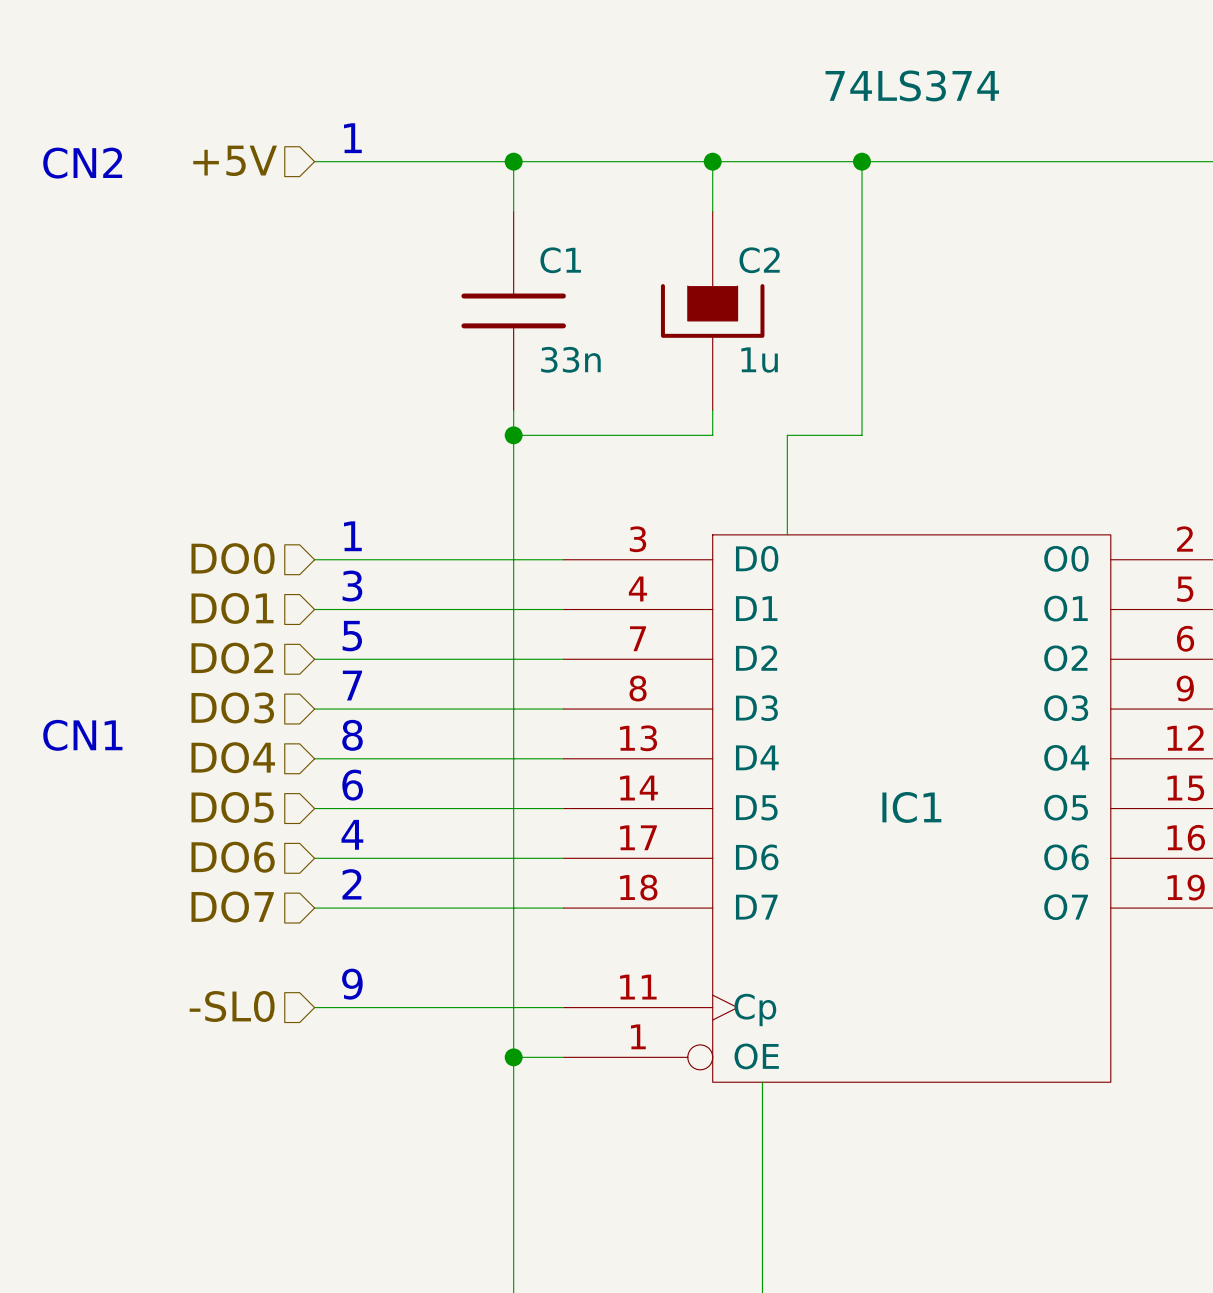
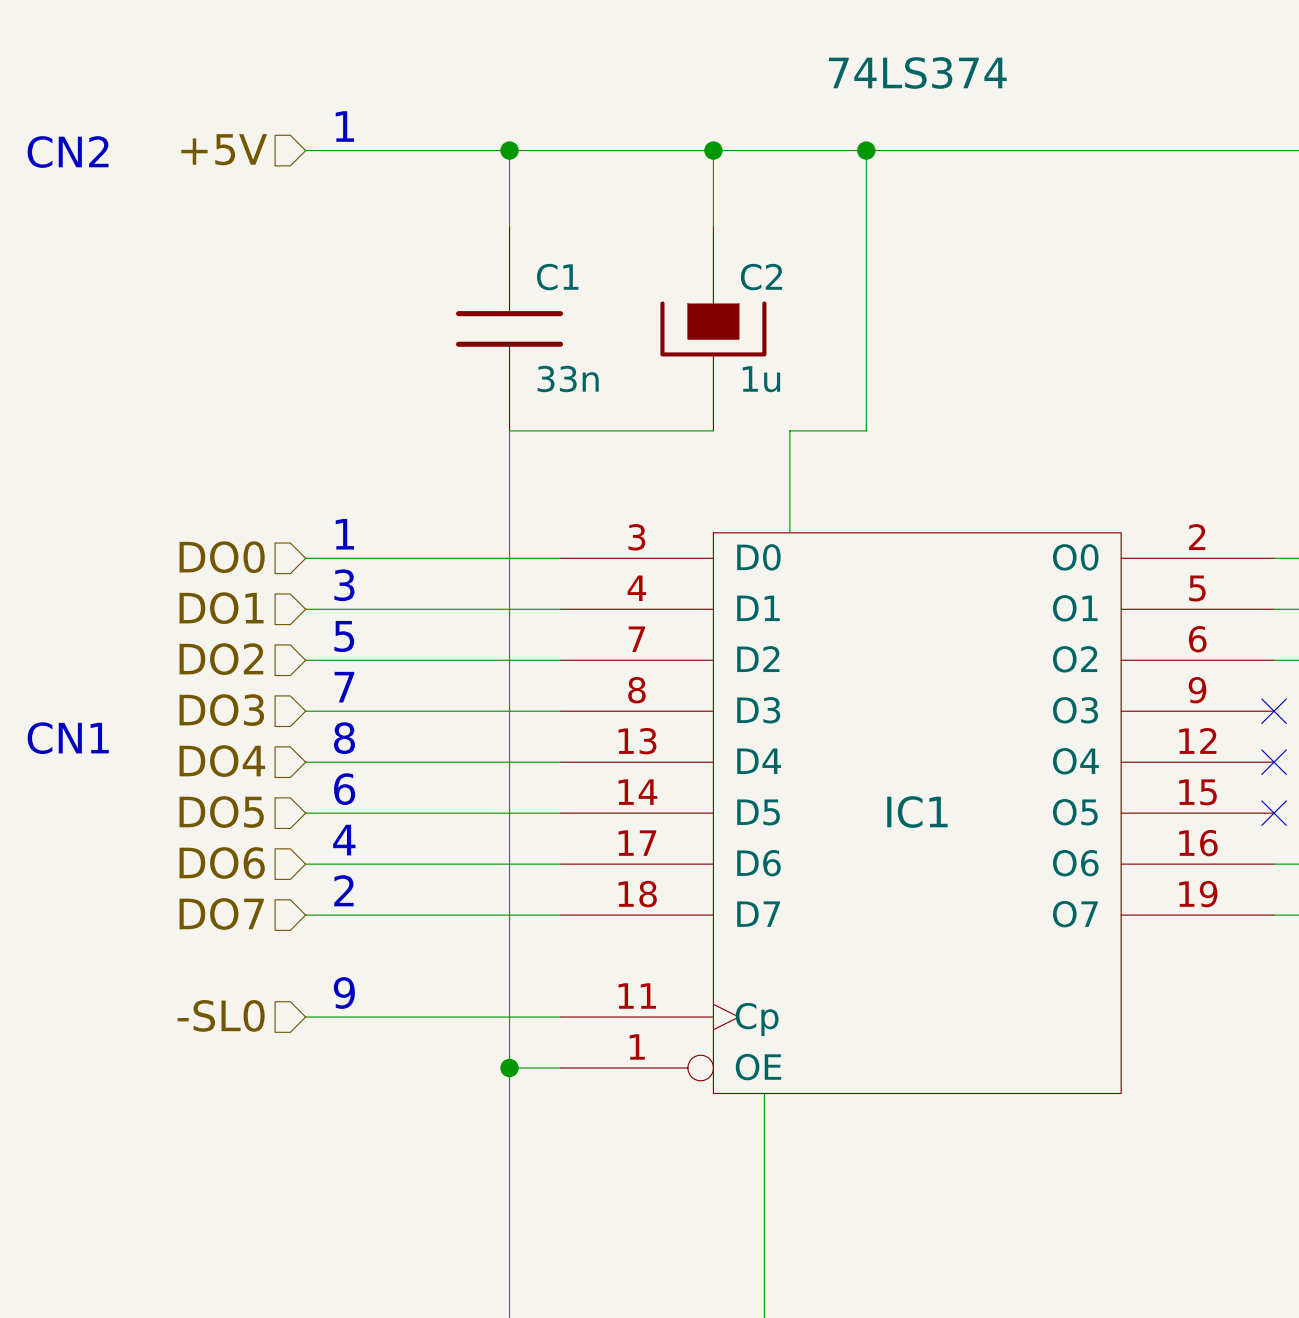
C1 position: (513, 310) -> (509, 328)
C2 position: (712, 310) -> (713, 328)
junction: (513, 435) -> none

